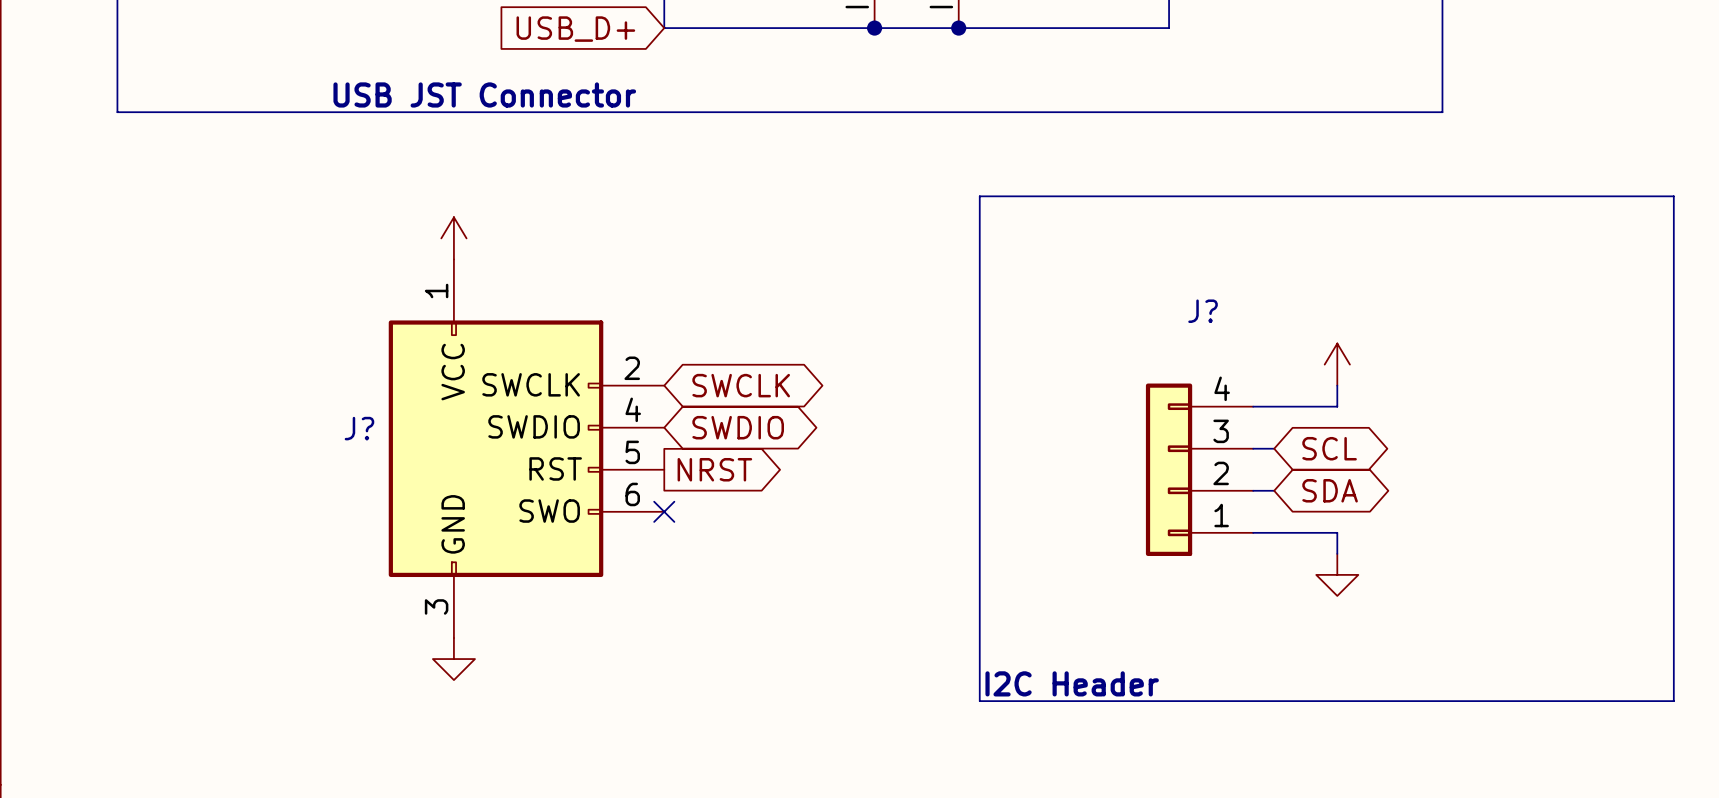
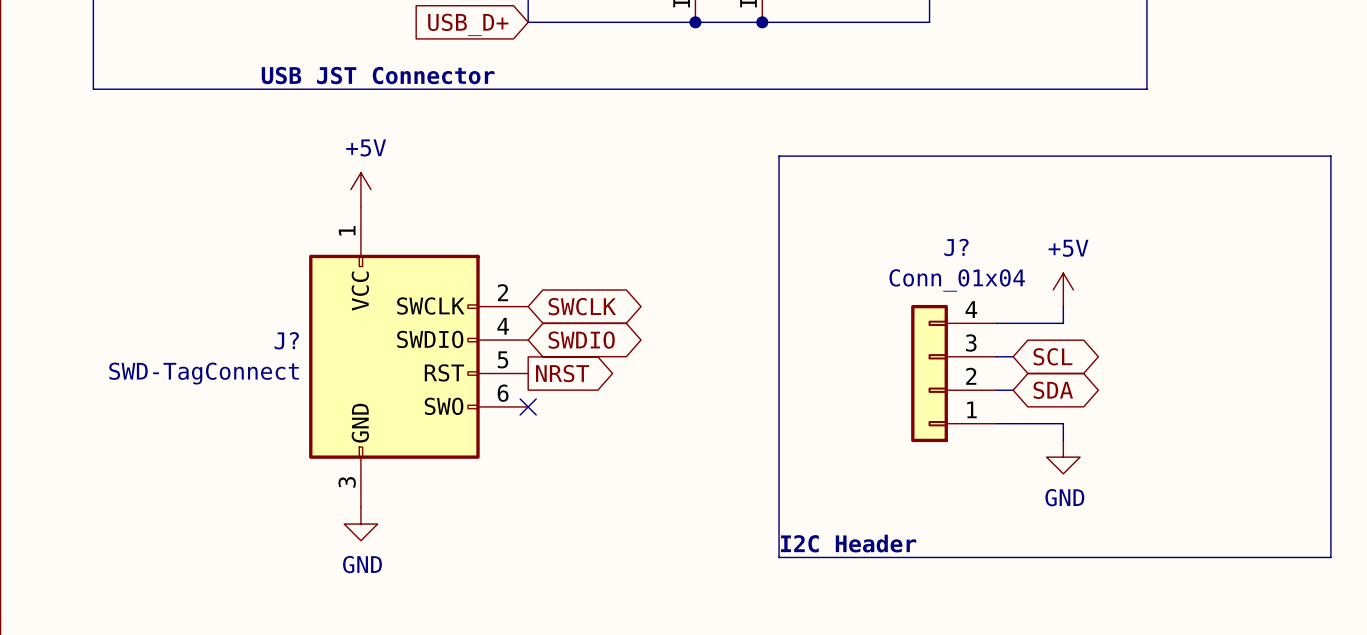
power symbol text: none -> +5V (366, 147)
power symbol text: none -> +5V (1068, 248)
J? value: none -> Conn_01x04 (957, 280)
J? value: none -> SWD-TagConnect (204, 373)
power symbol text: none -> GND (1064, 497)
power symbol text: none -> GND (362, 564)

